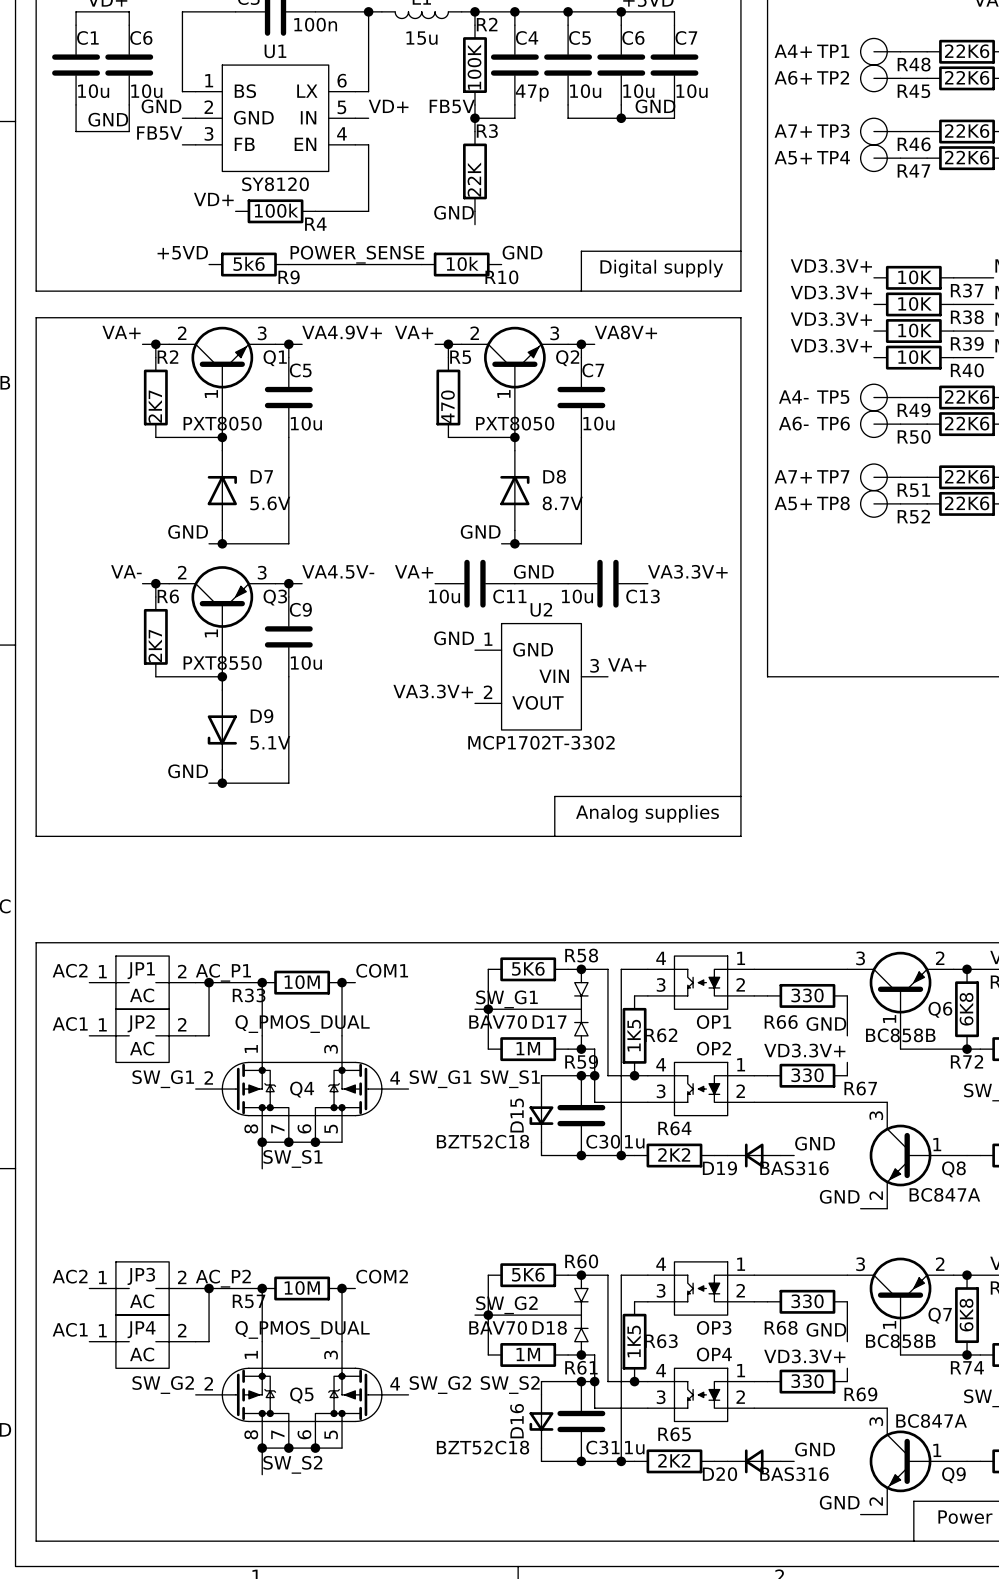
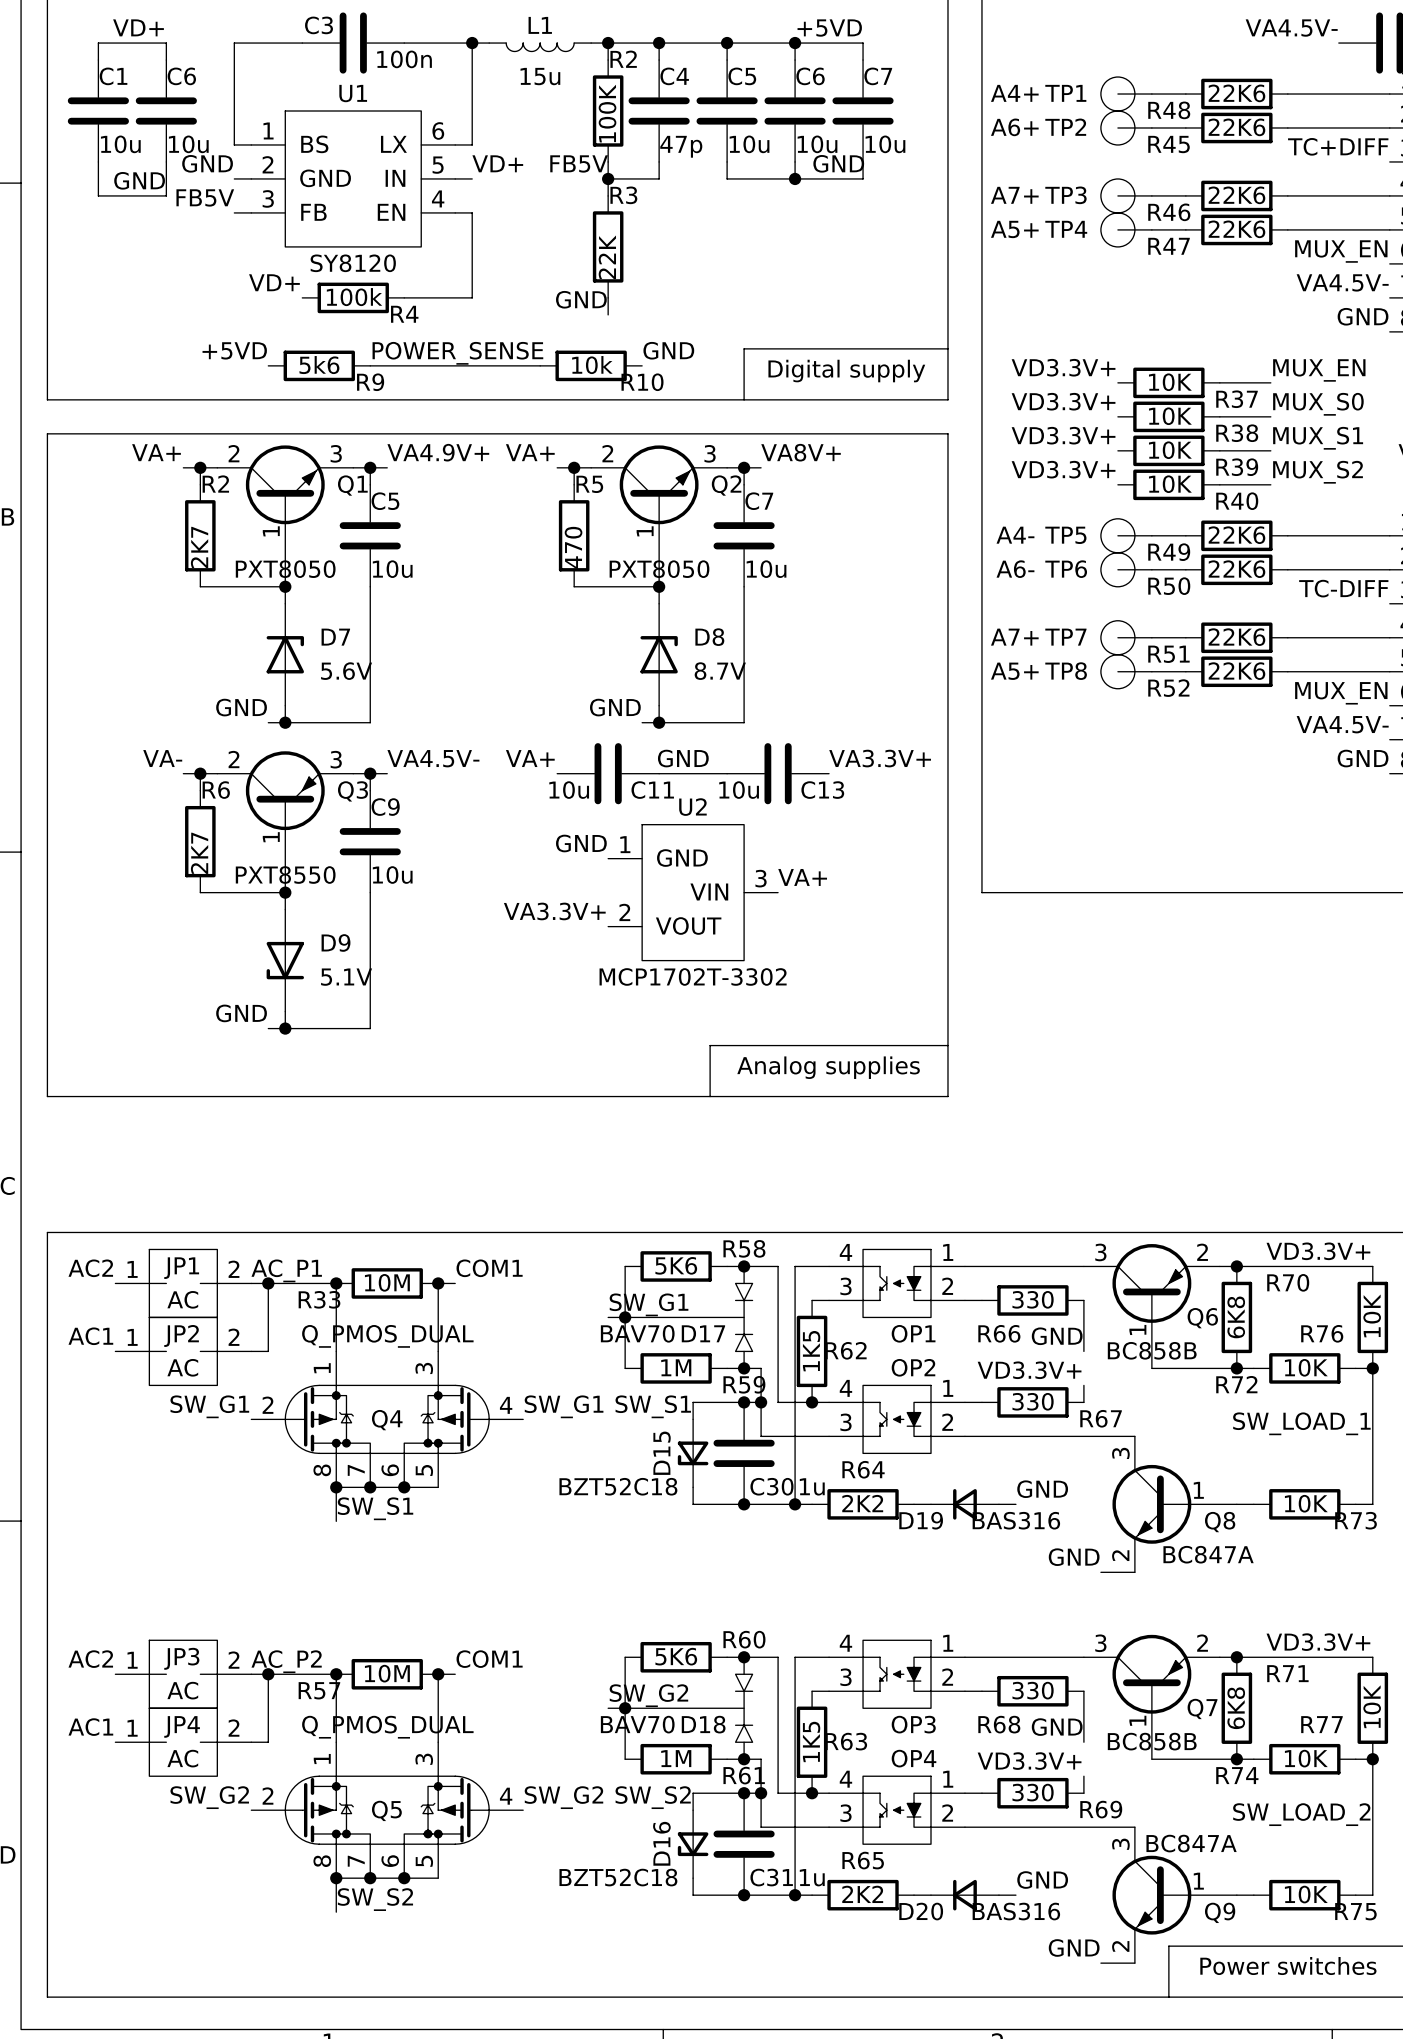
label: COM2 (382, 1276) -> COM1 (489, 1659)

